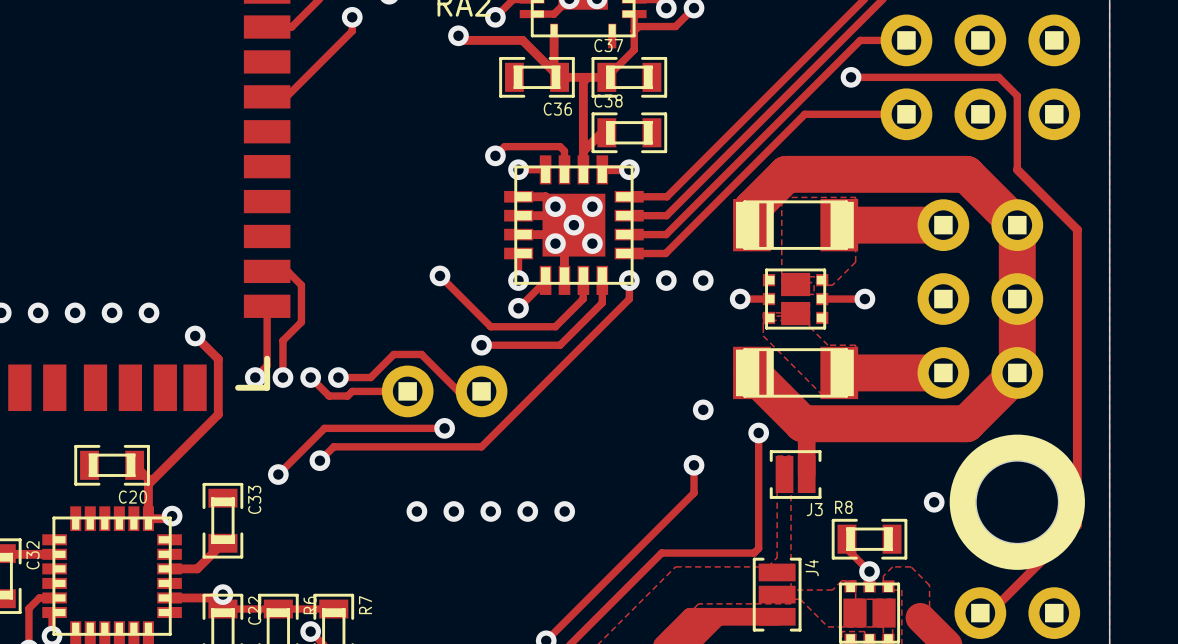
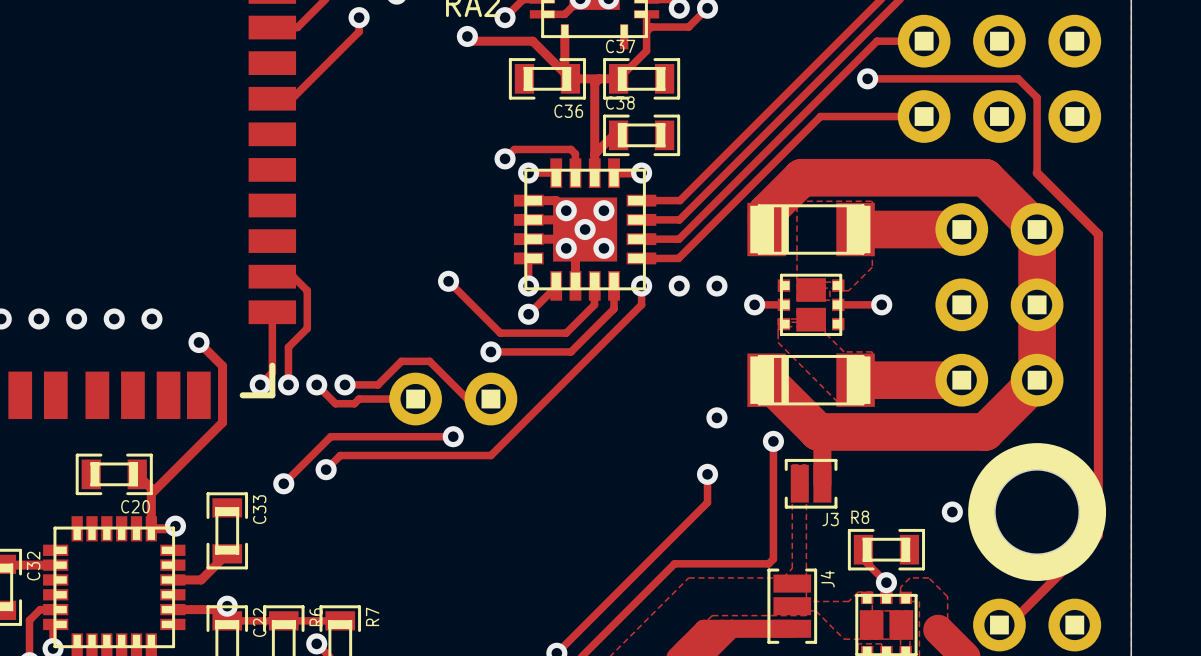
via: (416, 511) -> none
via: (453, 511) -> none
via: (490, 511) -> none
via: (527, 511) -> none
via: (564, 511) -> none

